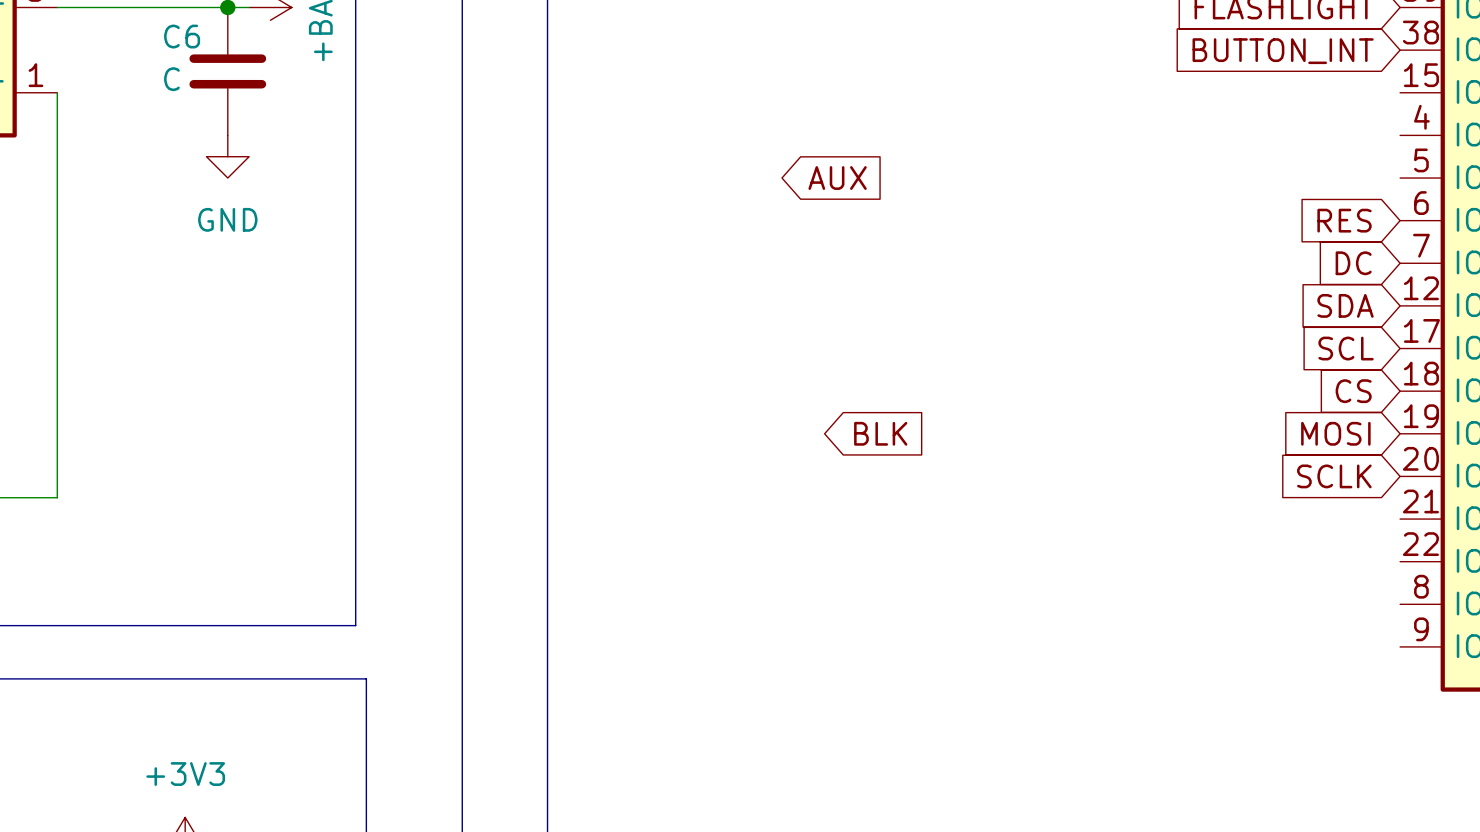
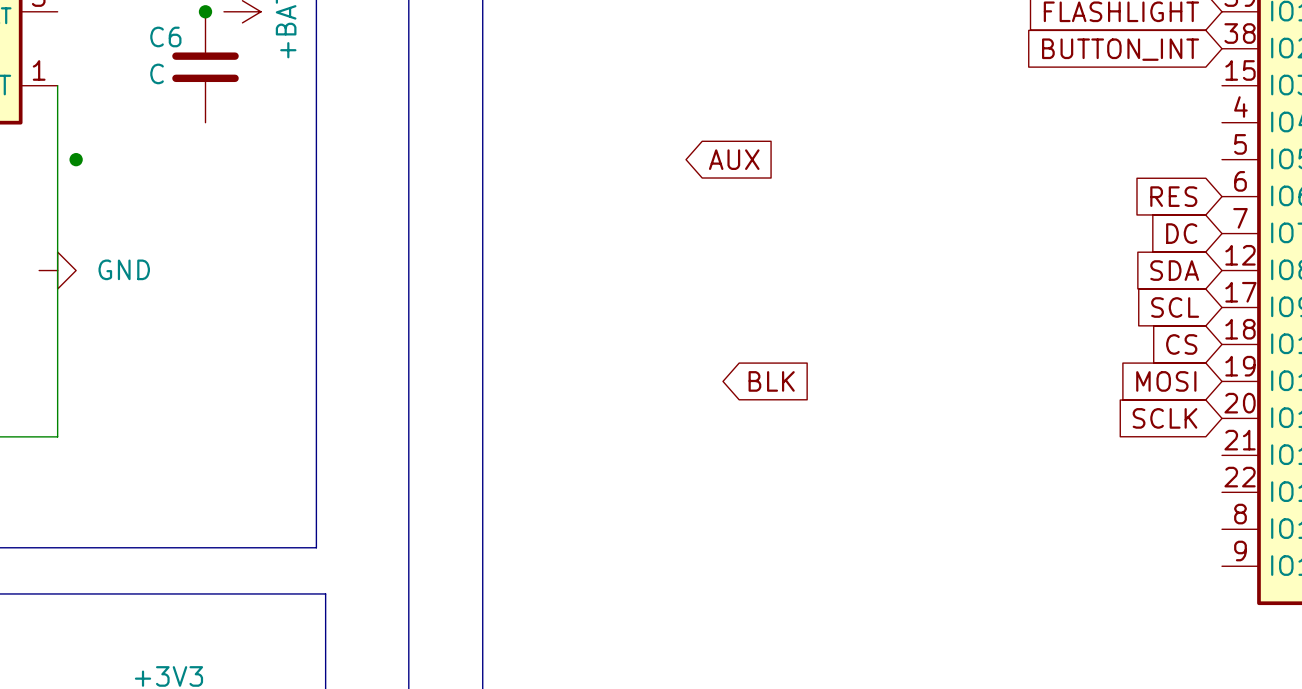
wire: (57, 7) (249, 7) -> none
power symbol: GND (227, 156) -> none
junction: none -> (76, 159)
power symbol: none -> GND (57, 270)

